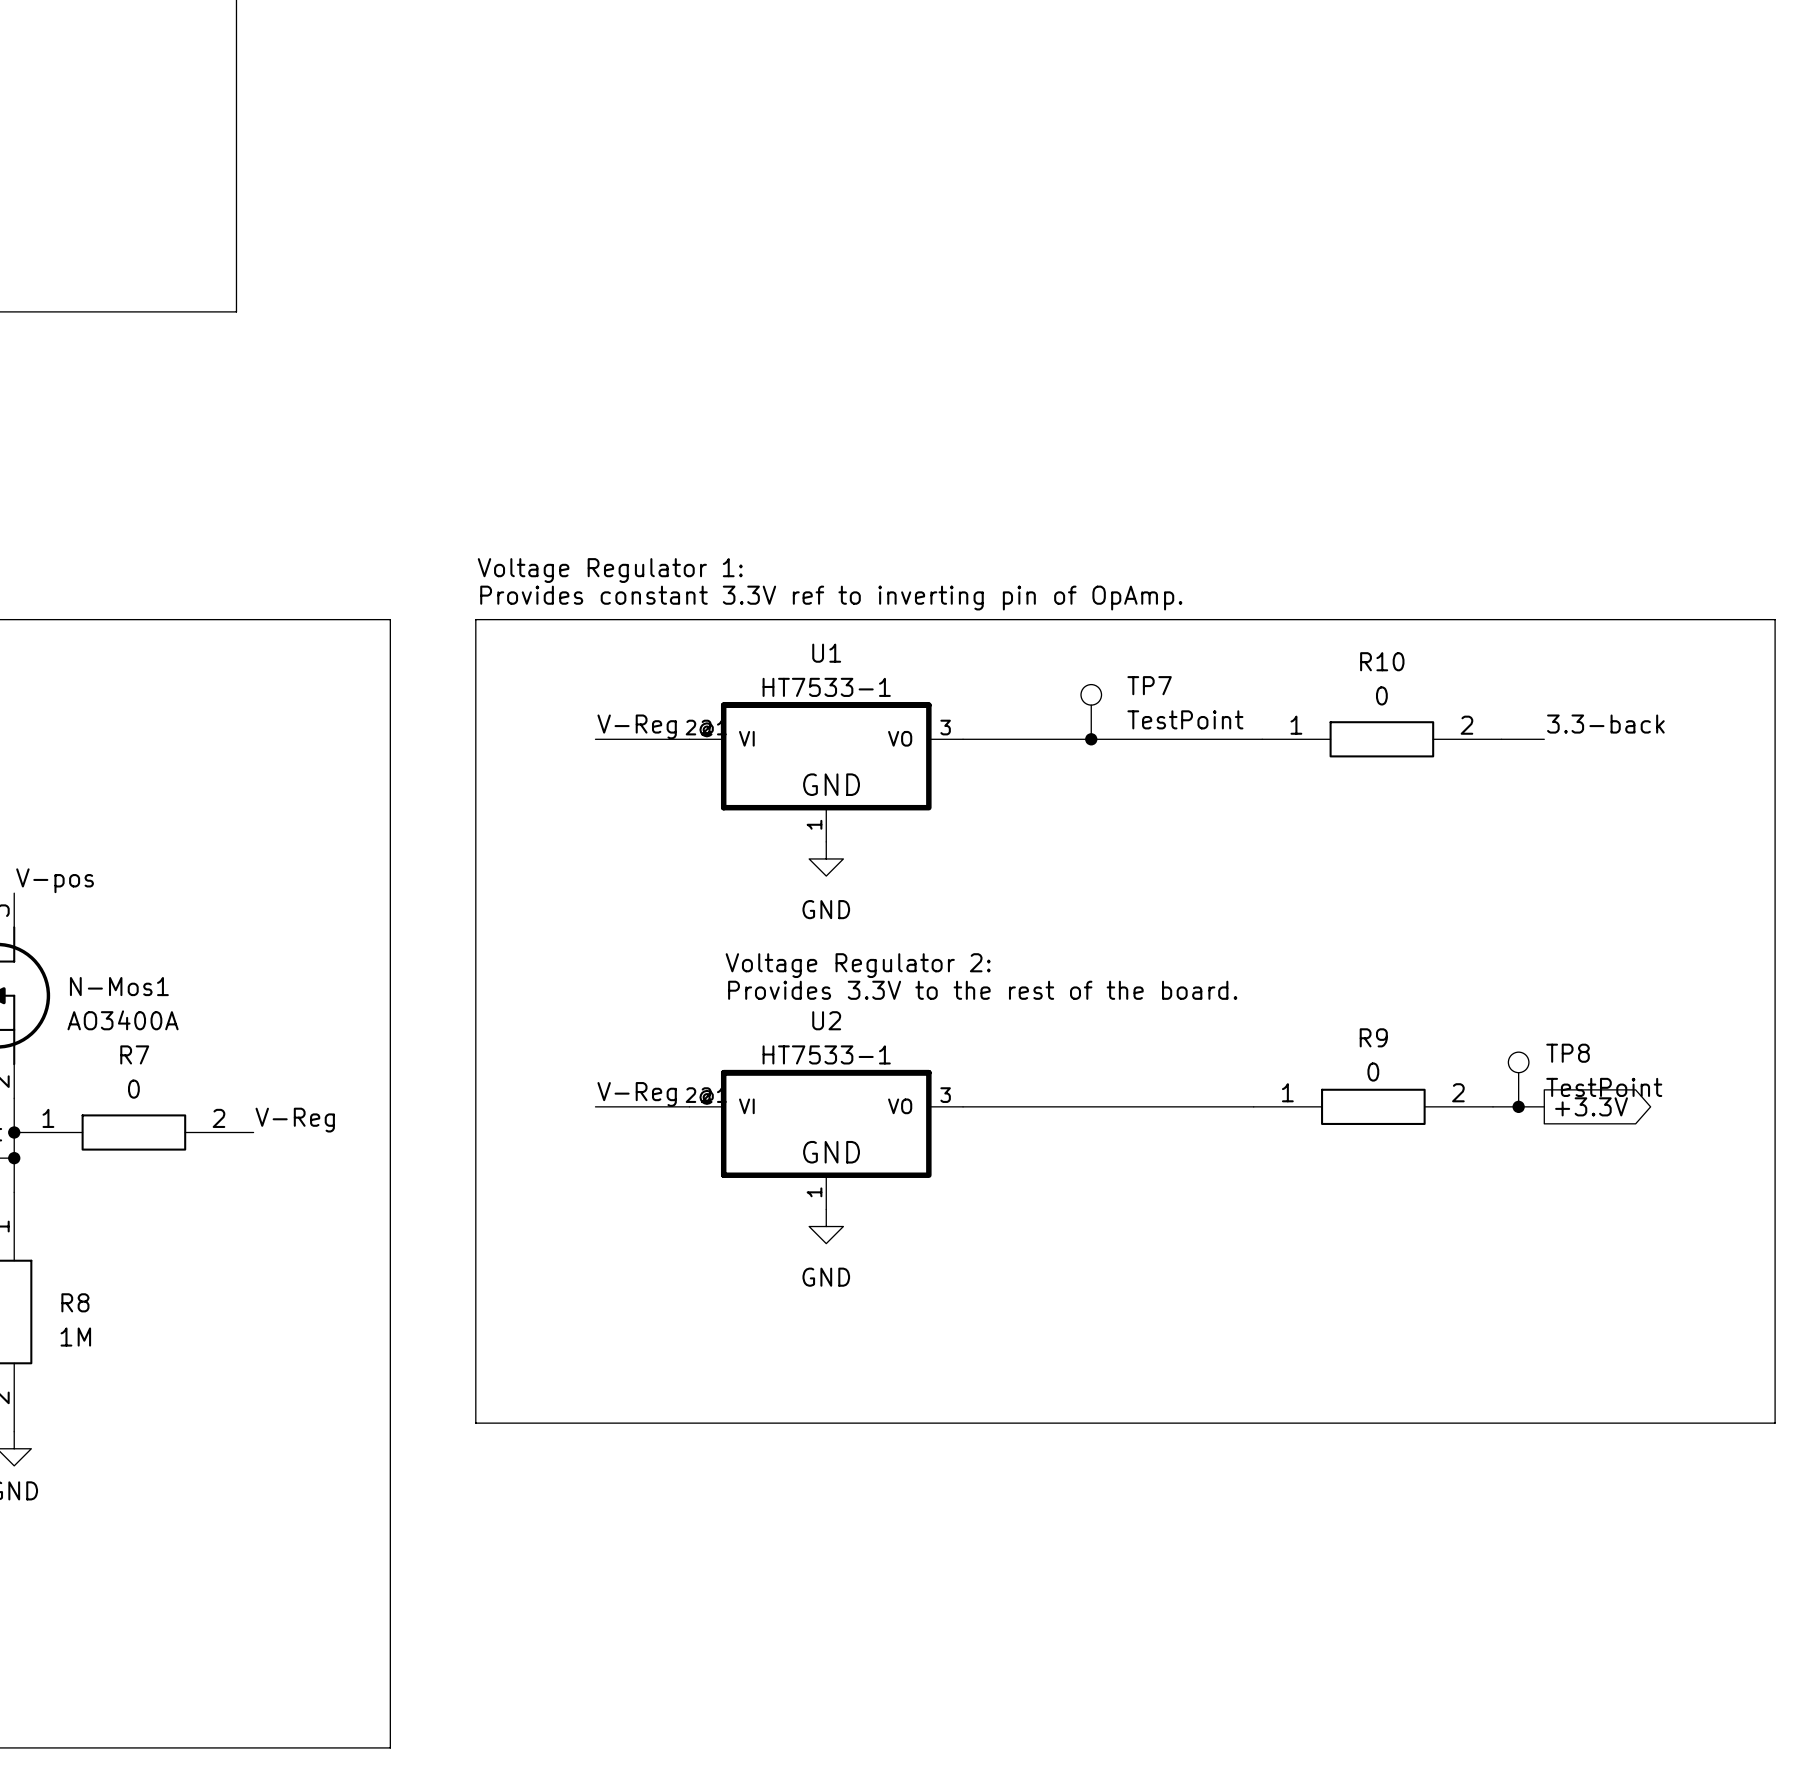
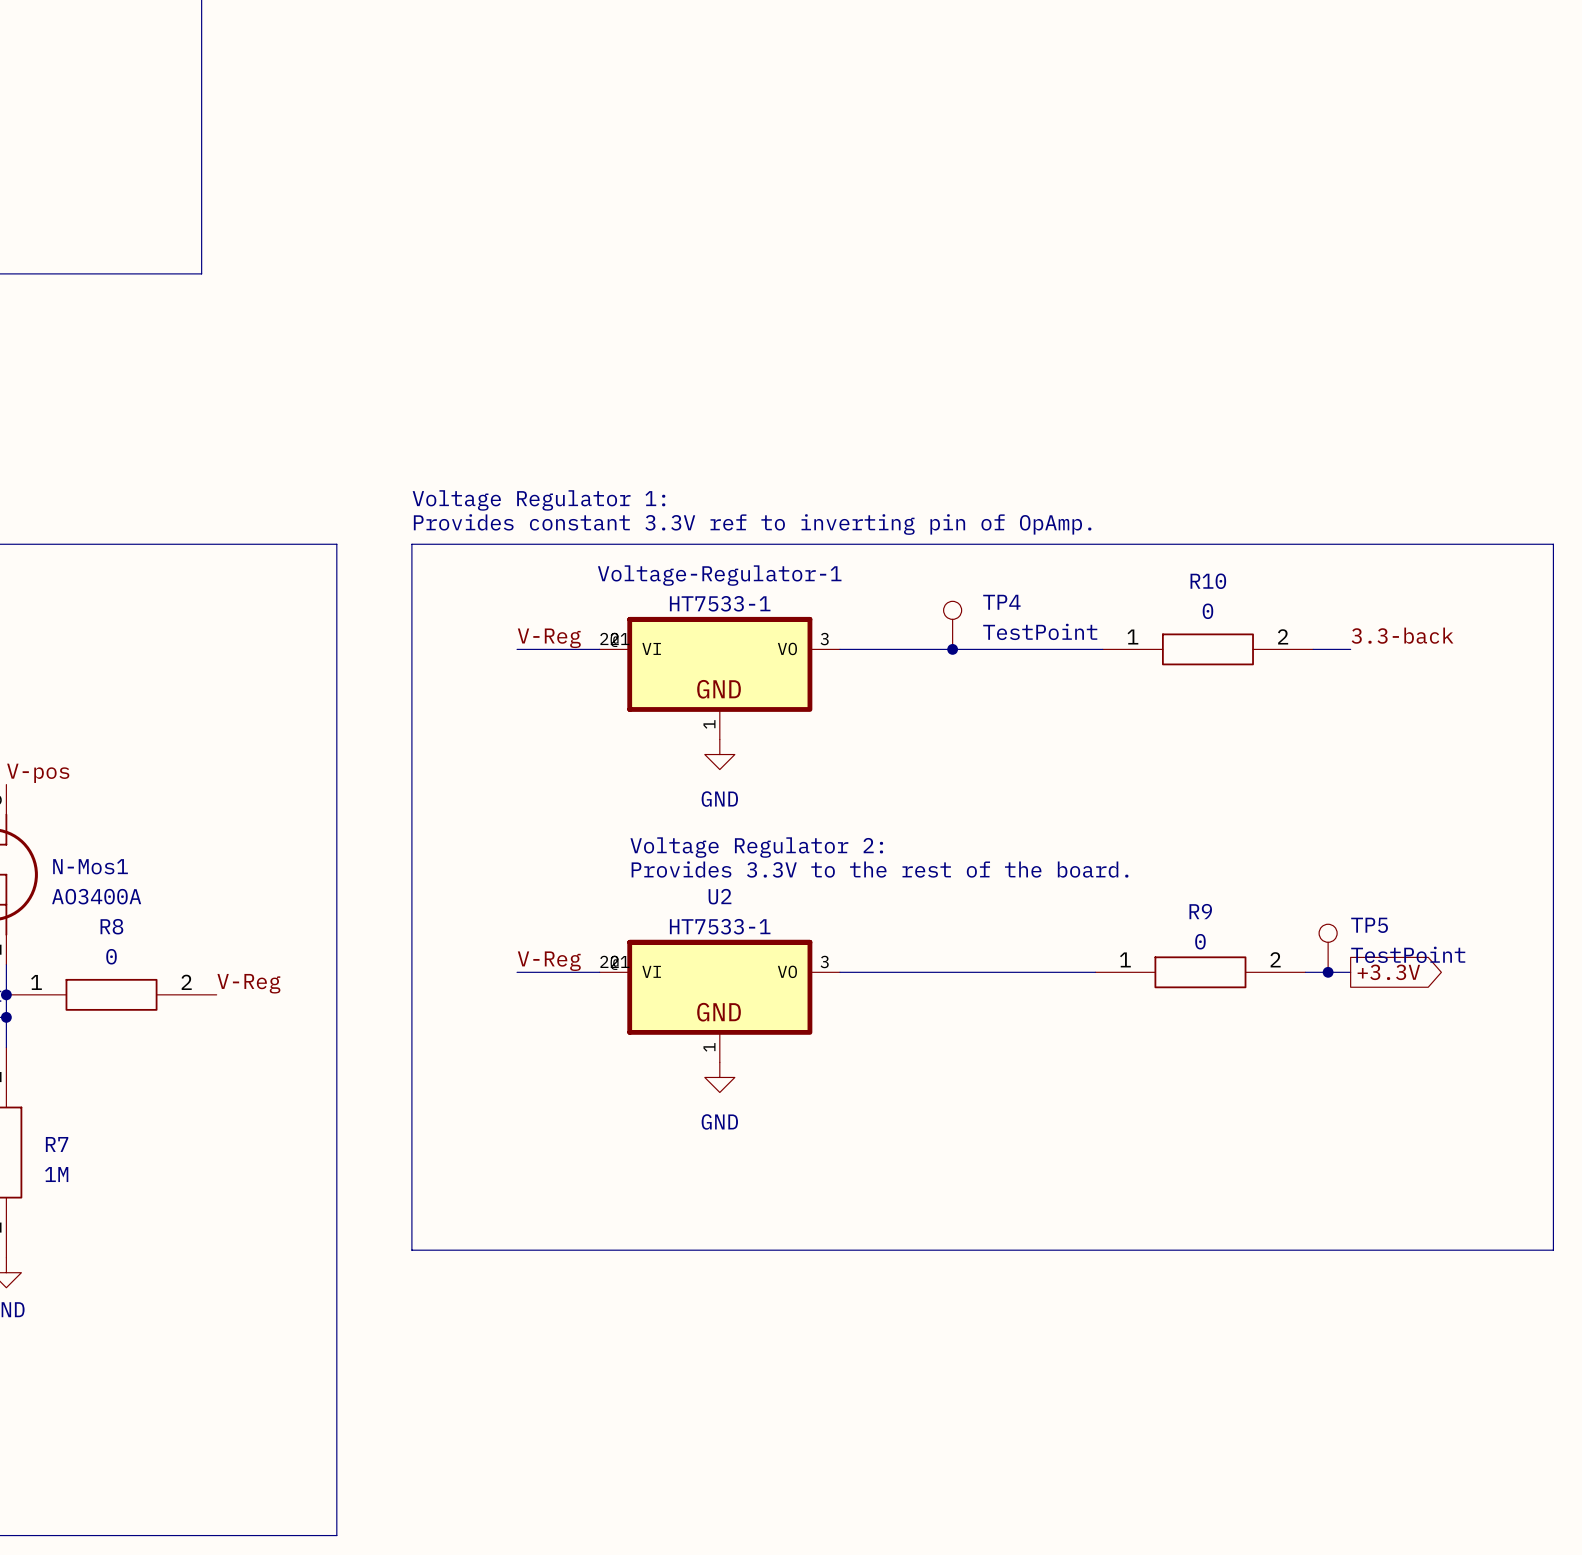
U1 name: U1 (826, 653) -> Voltage-Regulator-1 (719, 575)
TP7 name: TP7 (1149, 685) -> TP4 (1001, 602)
TP8 name: TP8 (1568, 1053) -> TP5 (1369, 925)
R7 name: R7 (134, 1054) -> R8 (111, 926)
R8 name: R8 (75, 1302) -> R7 (57, 1144)

